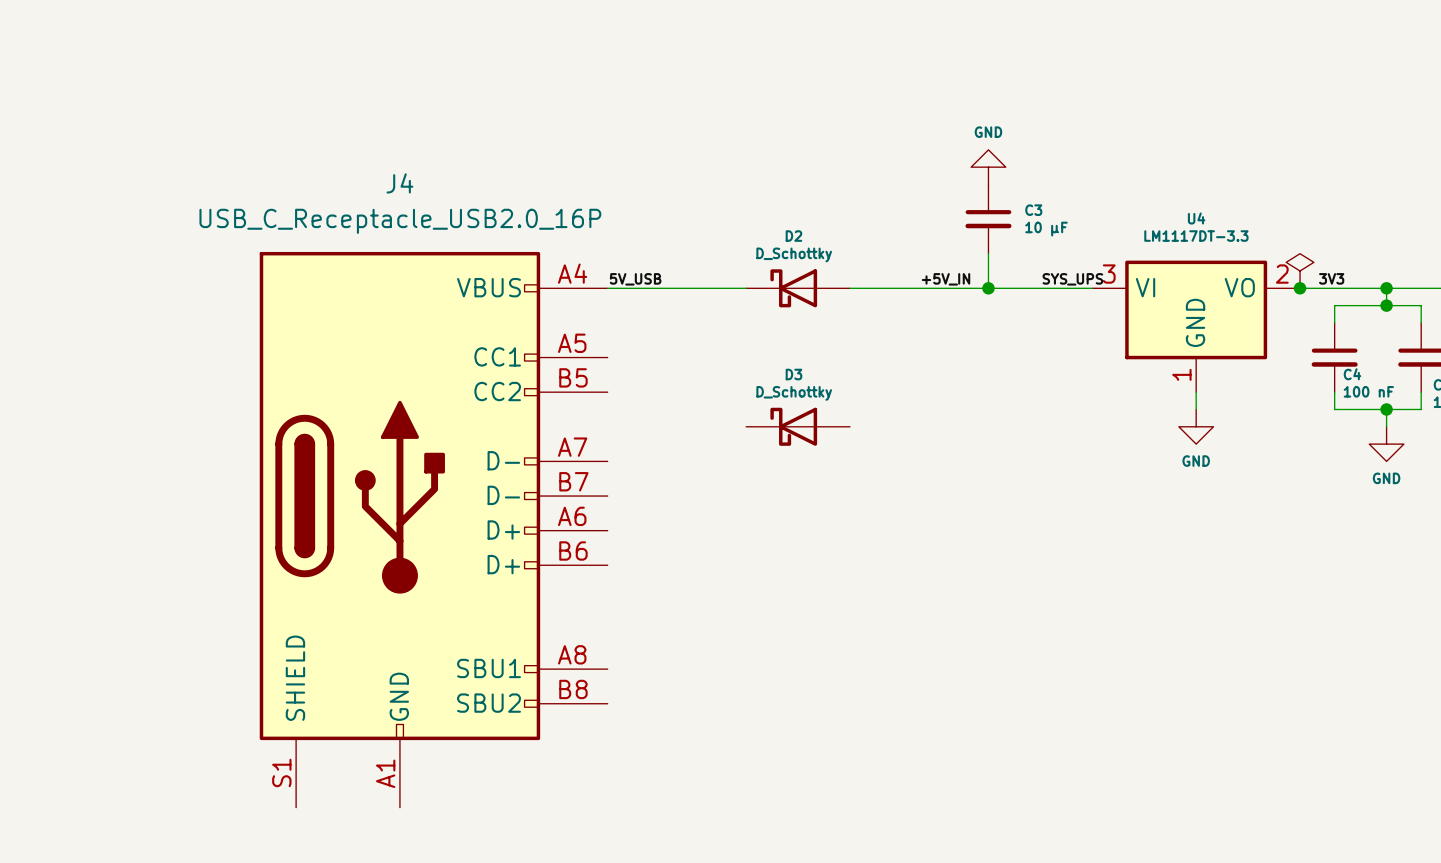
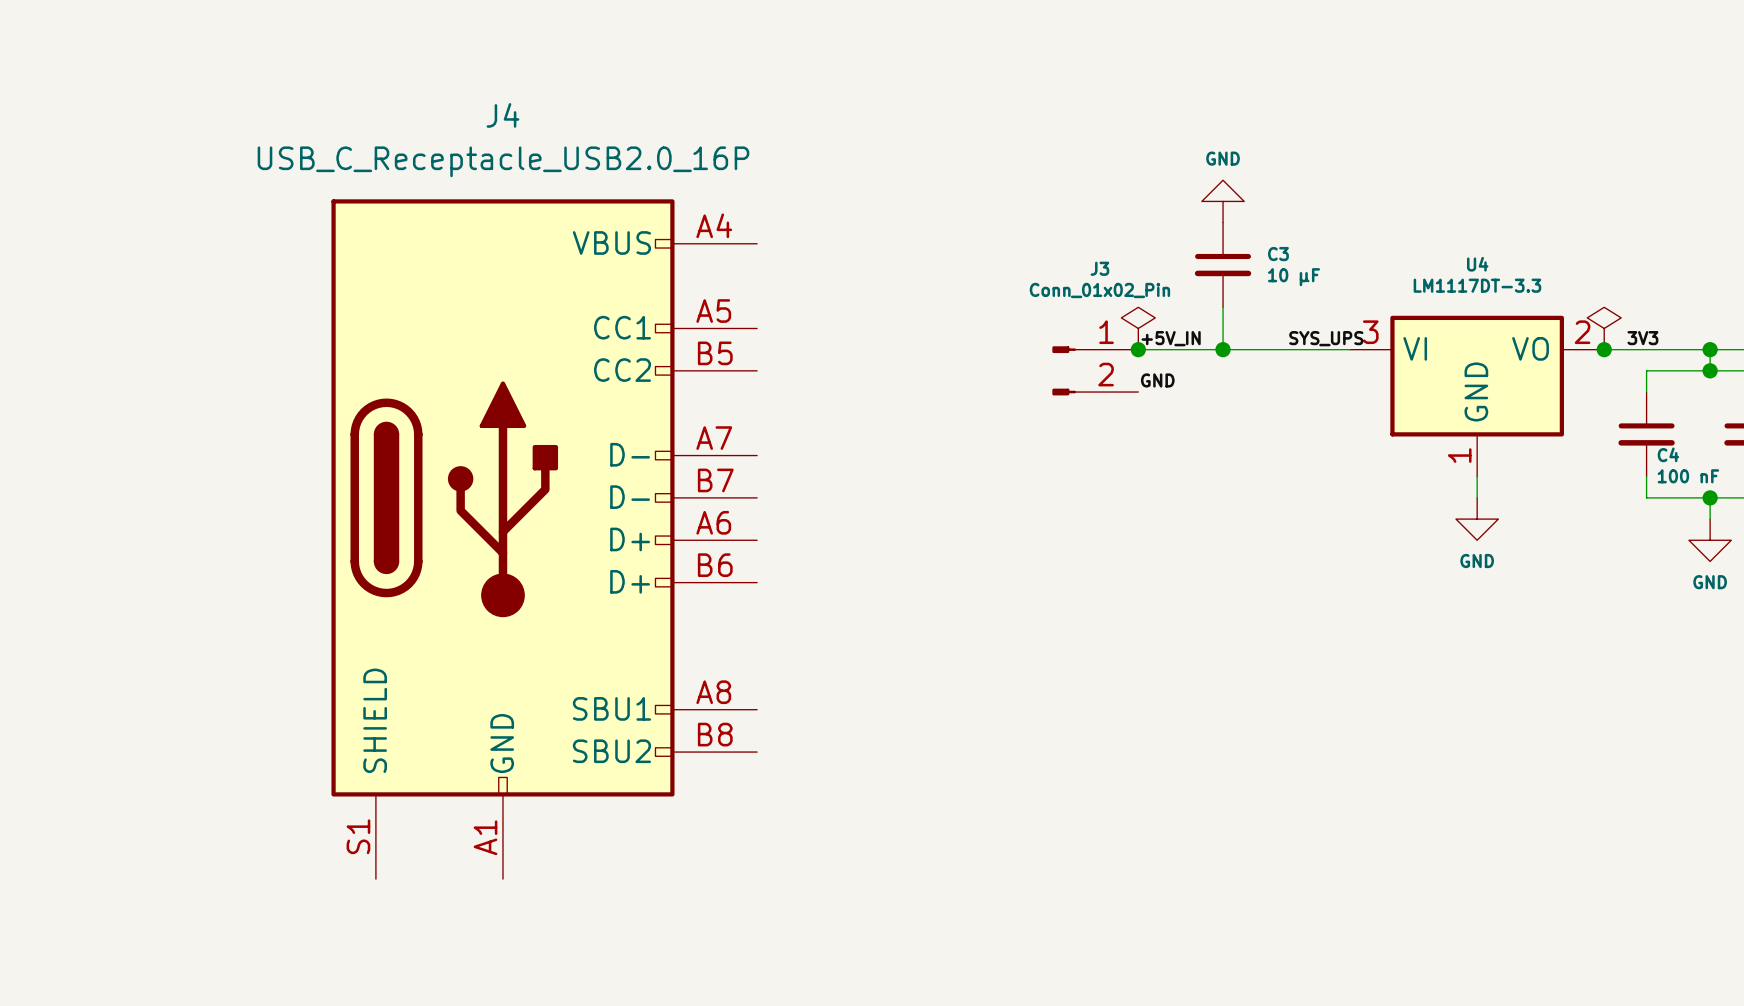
power symbol: none -> (1138, 328)
label: 5V_USB (635, 279) -> none
wire: (607, 288) (746, 288) -> none
D2: D_Schottky (798, 288) -> none
junction: none -> (1138, 349)
J3: none -> Conn_01x02_Pin (1095, 370)
label: none -> GND (1157, 380)
D3: D_Schottky (798, 426) -> none
J4 position: (433, 529) -> (544, 539)

